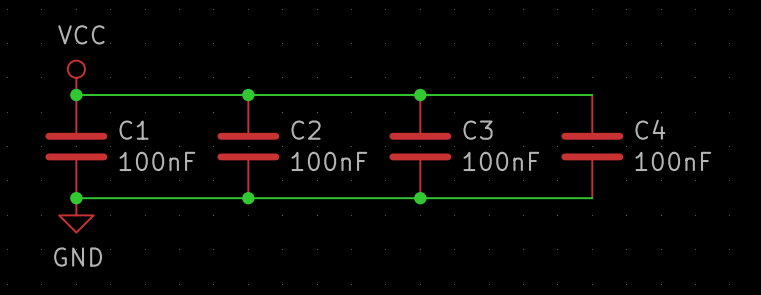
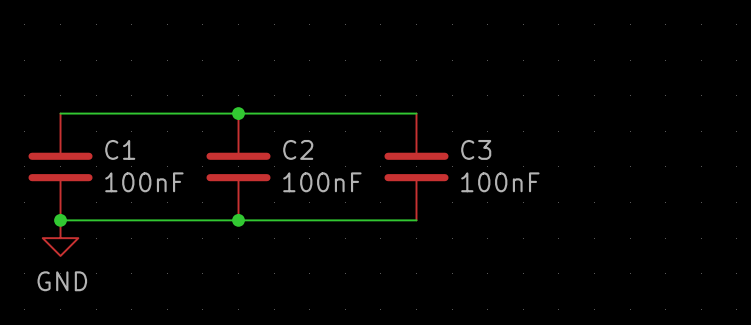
power symbol: VCC (76, 77) -> none
junction: (76, 95) -> none
wire: (420, 95) (592, 95) -> none
junction: (420, 95) -> none
C4: 100nF (592, 146) -> none
wire: (420, 198) (592, 198) -> none
junction: (420, 198) -> none

